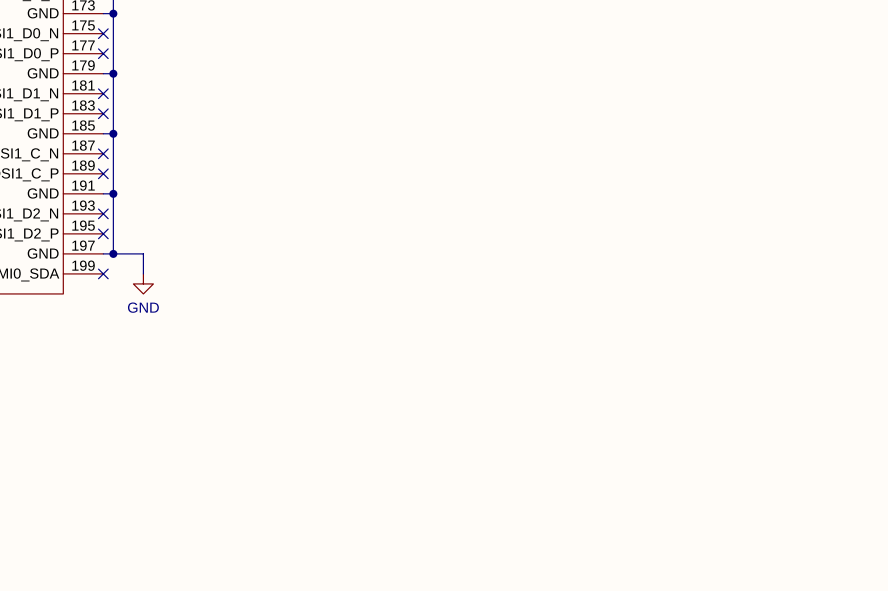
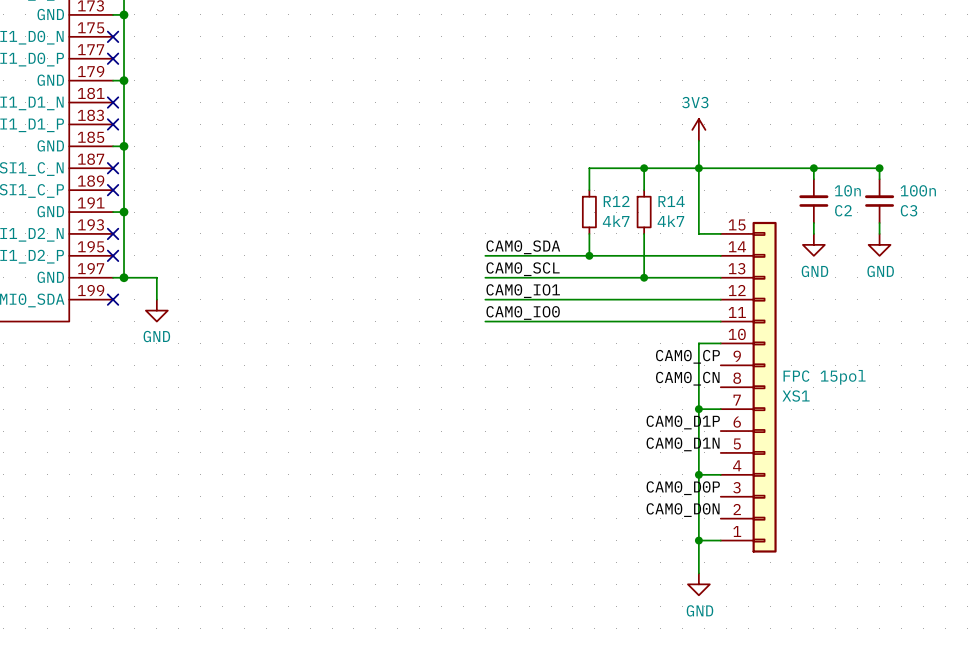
power symbol: none -> 3V3 (698, 129)
wire: none -> (698, 140) (698, 233) (720, 233)
wire: none -> (644, 168) (644, 190)
junction: none -> (644, 168)
junction: none -> (698, 168)
wire: none -> (813, 168) (813, 179)
junction: none -> (813, 168)
wire: none -> (879, 168) (879, 179)
wire: none -> (880, 168) (589, 168) (589, 190)
junction: none -> (879, 168)
C2: none -> 10n (813, 201)
C3: none -> 100n (879, 201)
R12: none -> 4k7 (589, 212)
R14: none -> 4k7 (644, 212)
wire: none -> (813, 222) (813, 233)
wire: none -> (879, 222) (879, 233)
wire: none -> (589, 233) (589, 255)
wire: none -> (644, 233) (644, 277)
power symbol: none -> GND (813, 244)
power symbol: none -> GND (879, 244)
label: none -> CAM0_SDA (523, 247)
wire: none -> (485, 255) (720, 255)
junction: none -> (589, 255)
label: none -> CAM0_SCL (523, 269)
wire: none -> (485, 277) (720, 277)
junction: none -> (644, 277)
label: none -> CAM0_IO1 (523, 291)
wire: none -> (485, 299) (720, 299)
label: none -> CAM0_IO0 (523, 313)
wire: none -> (485, 321) (720, 321)
wire: none -> (720, 343) (698, 343) (698, 573)
label: none -> CAM0_CP (687, 356)
label: none -> CAM0_CN (687, 378)
XS1: none -> FPC 15pol (748, 387)
wire: none -> (698, 409) (720, 409)
junction: none -> (698, 409)
label: none -> CAM0_D1P (683, 422)
label: none -> CAM0_D1N (683, 444)
wire: none -> (698, 474) (720, 474)
junction: none -> (698, 474)
label: none -> CAM0_D0P (683, 488)
label: none -> CAM0_D0N (683, 510)
wire: none -> (698, 540) (720, 540)
junction: none -> (698, 540)
power symbol: none -> GND (698, 584)

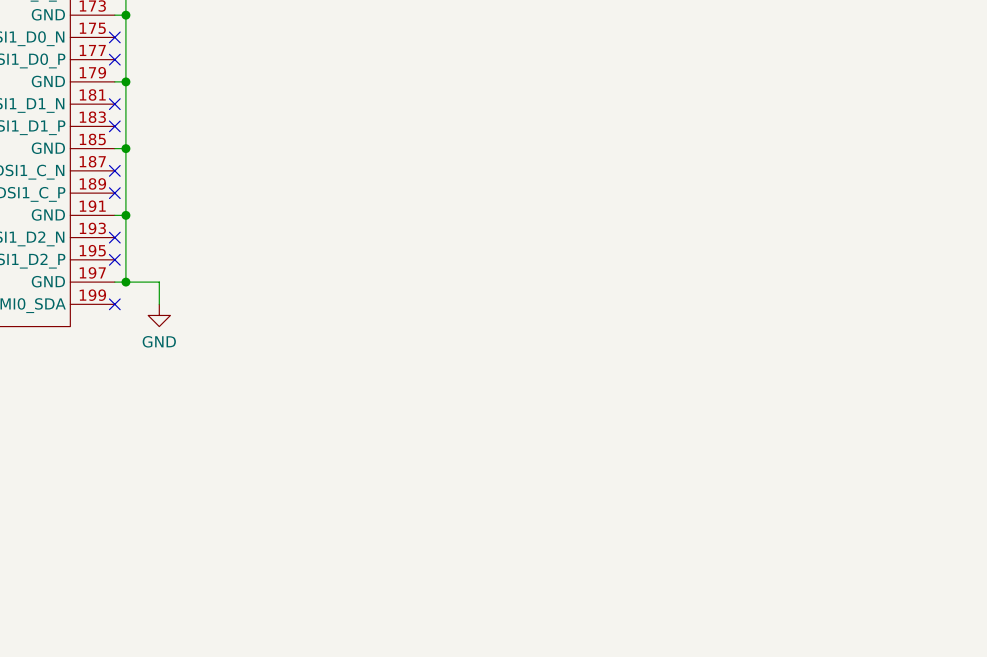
power symbol: 3V3 (698, 129) -> none
wire: (698, 140) (698, 233) (720, 233) -> none
wire: (644, 168) (644, 190) -> none
junction: (644, 168) -> none
junction: (698, 168) -> none
wire: (813, 168) (813, 179) -> none
junction: (813, 168) -> none
wire: (879, 168) (879, 179) -> none
junction: (879, 168) -> none
wire: (880, 168) (589, 168) (589, 190) -> none
C2: 10n (813, 201) -> none
C3: 100n (879, 201) -> none
R12: 4k7 (589, 212) -> none
R14: 4k7 (644, 212) -> none
wire: (813, 222) (813, 233) -> none
wire: (879, 222) (879, 233) -> none
wire: (589, 233) (589, 255) -> none
wire: (644, 233) (644, 277) -> none
power symbol: GND (813, 244) -> none
power symbol: GND (879, 244) -> none
label: CAM0_SDA (523, 247) -> none
wire: (485, 255) (720, 255) -> none
junction: (589, 255) -> none
label: CAM0_SCL (523, 269) -> none
wire: (485, 277) (720, 277) -> none
junction: (644, 277) -> none
label: CAM0_IO1 (523, 291) -> none
wire: (485, 299) (720, 299) -> none
label: CAM0_IO0 (523, 313) -> none
wire: (485, 321) (720, 321) -> none
wire: (720, 343) (698, 343) (698, 573) -> none
label: CAM0_CP (687, 356) -> none
label: CAM0_CN (687, 378) -> none
XS1: FPC 15pol (748, 387) -> none
wire: (698, 409) (720, 409) -> none
junction: (698, 409) -> none
label: CAM0_D1P (683, 422) -> none
label: CAM0_D1N (683, 444) -> none
wire: (698, 474) (720, 474) -> none
junction: (698, 474) -> none
label: CAM0_D0P (683, 488) -> none
label: CAM0_D0N (683, 510) -> none
wire: (698, 540) (720, 540) -> none
junction: (698, 540) -> none
power symbol: GND (698, 584) -> none

